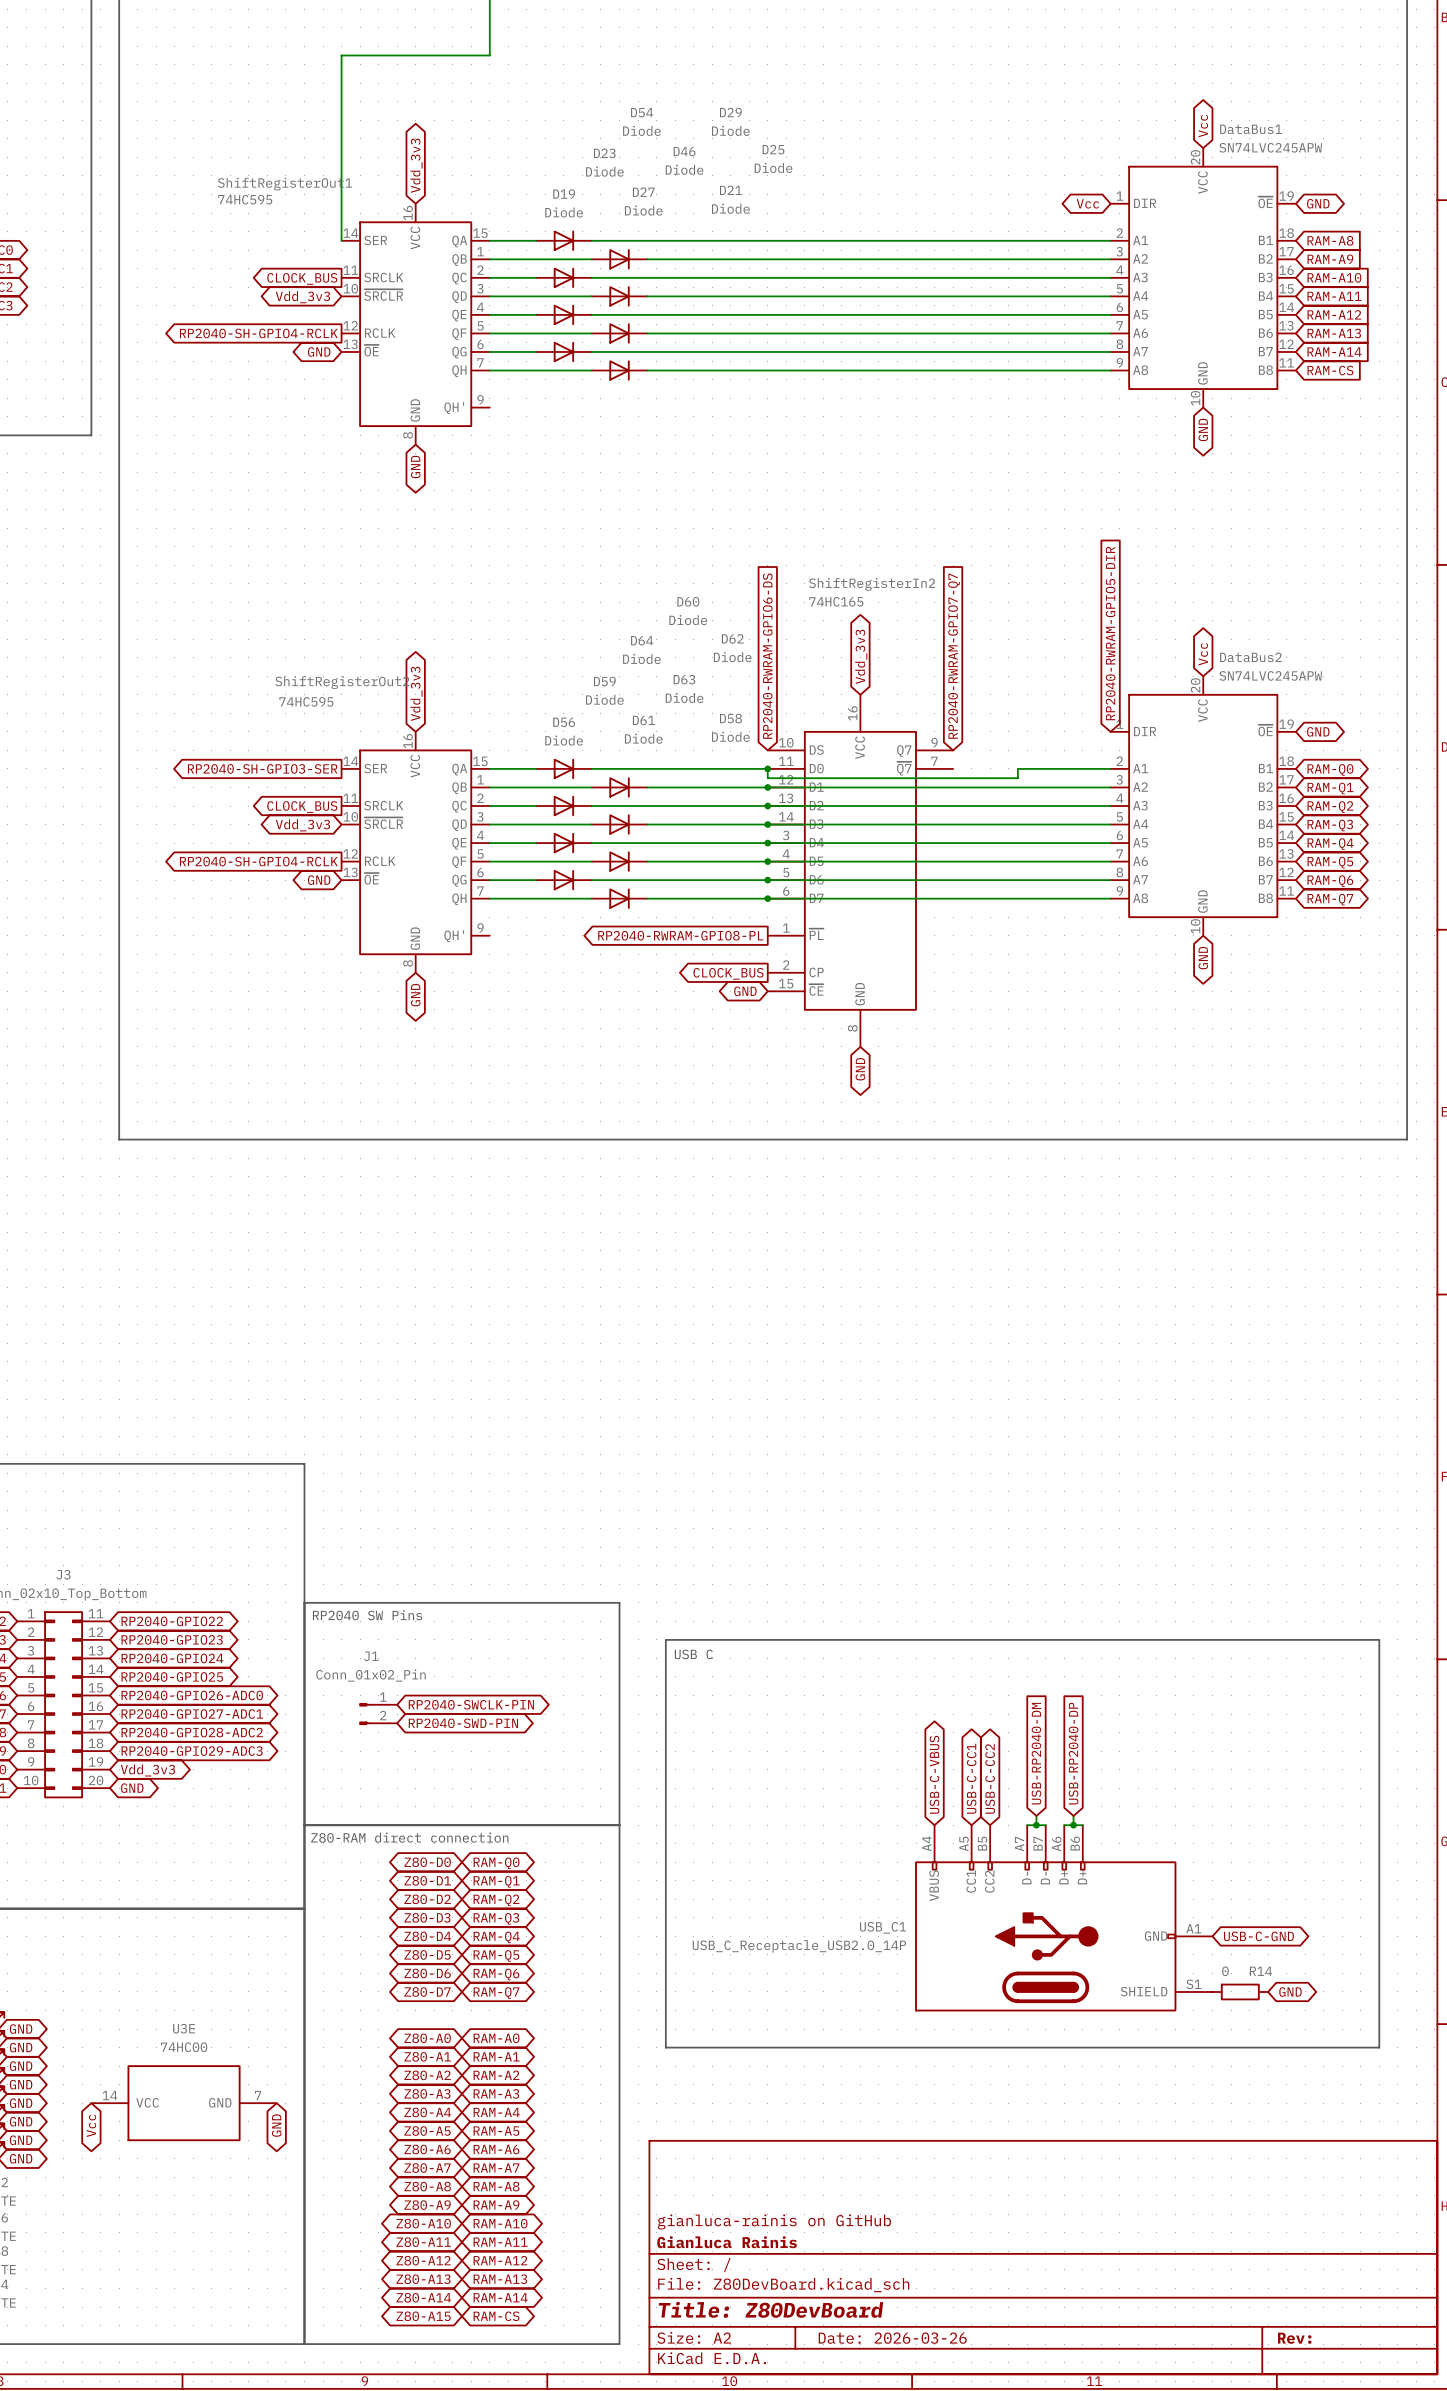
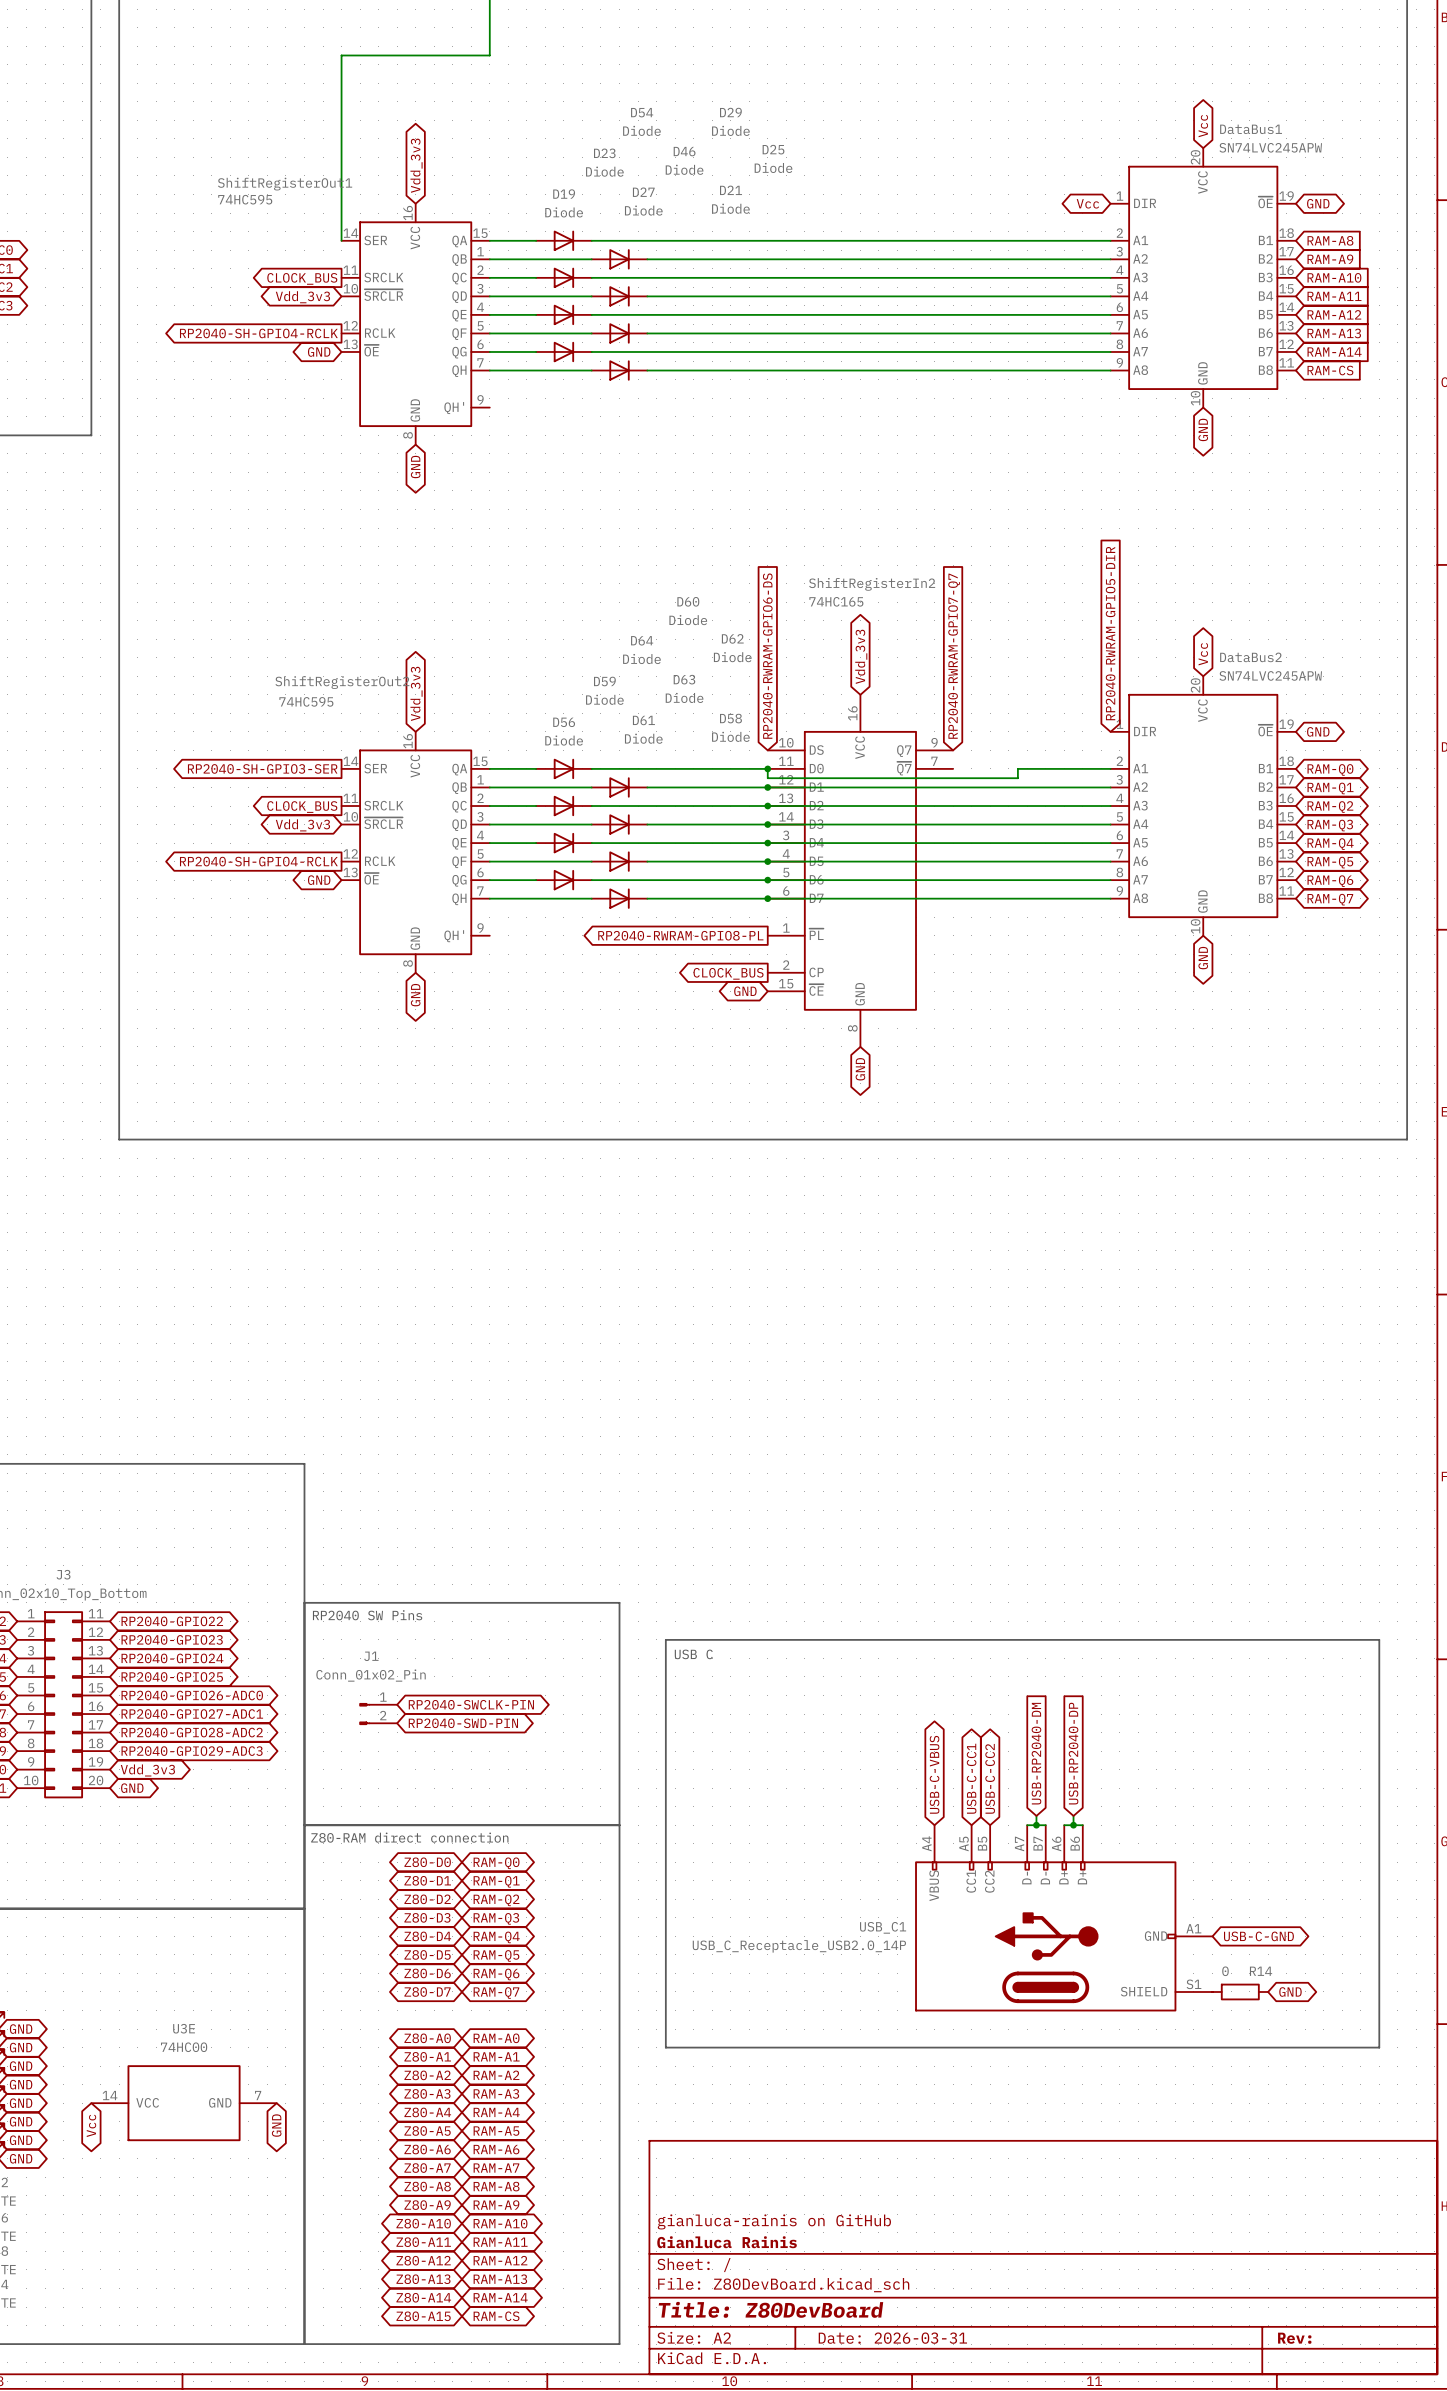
title block: Date: 2026-03-26 (892, 2338) -> Date: 2026-03-31 (892, 2338)

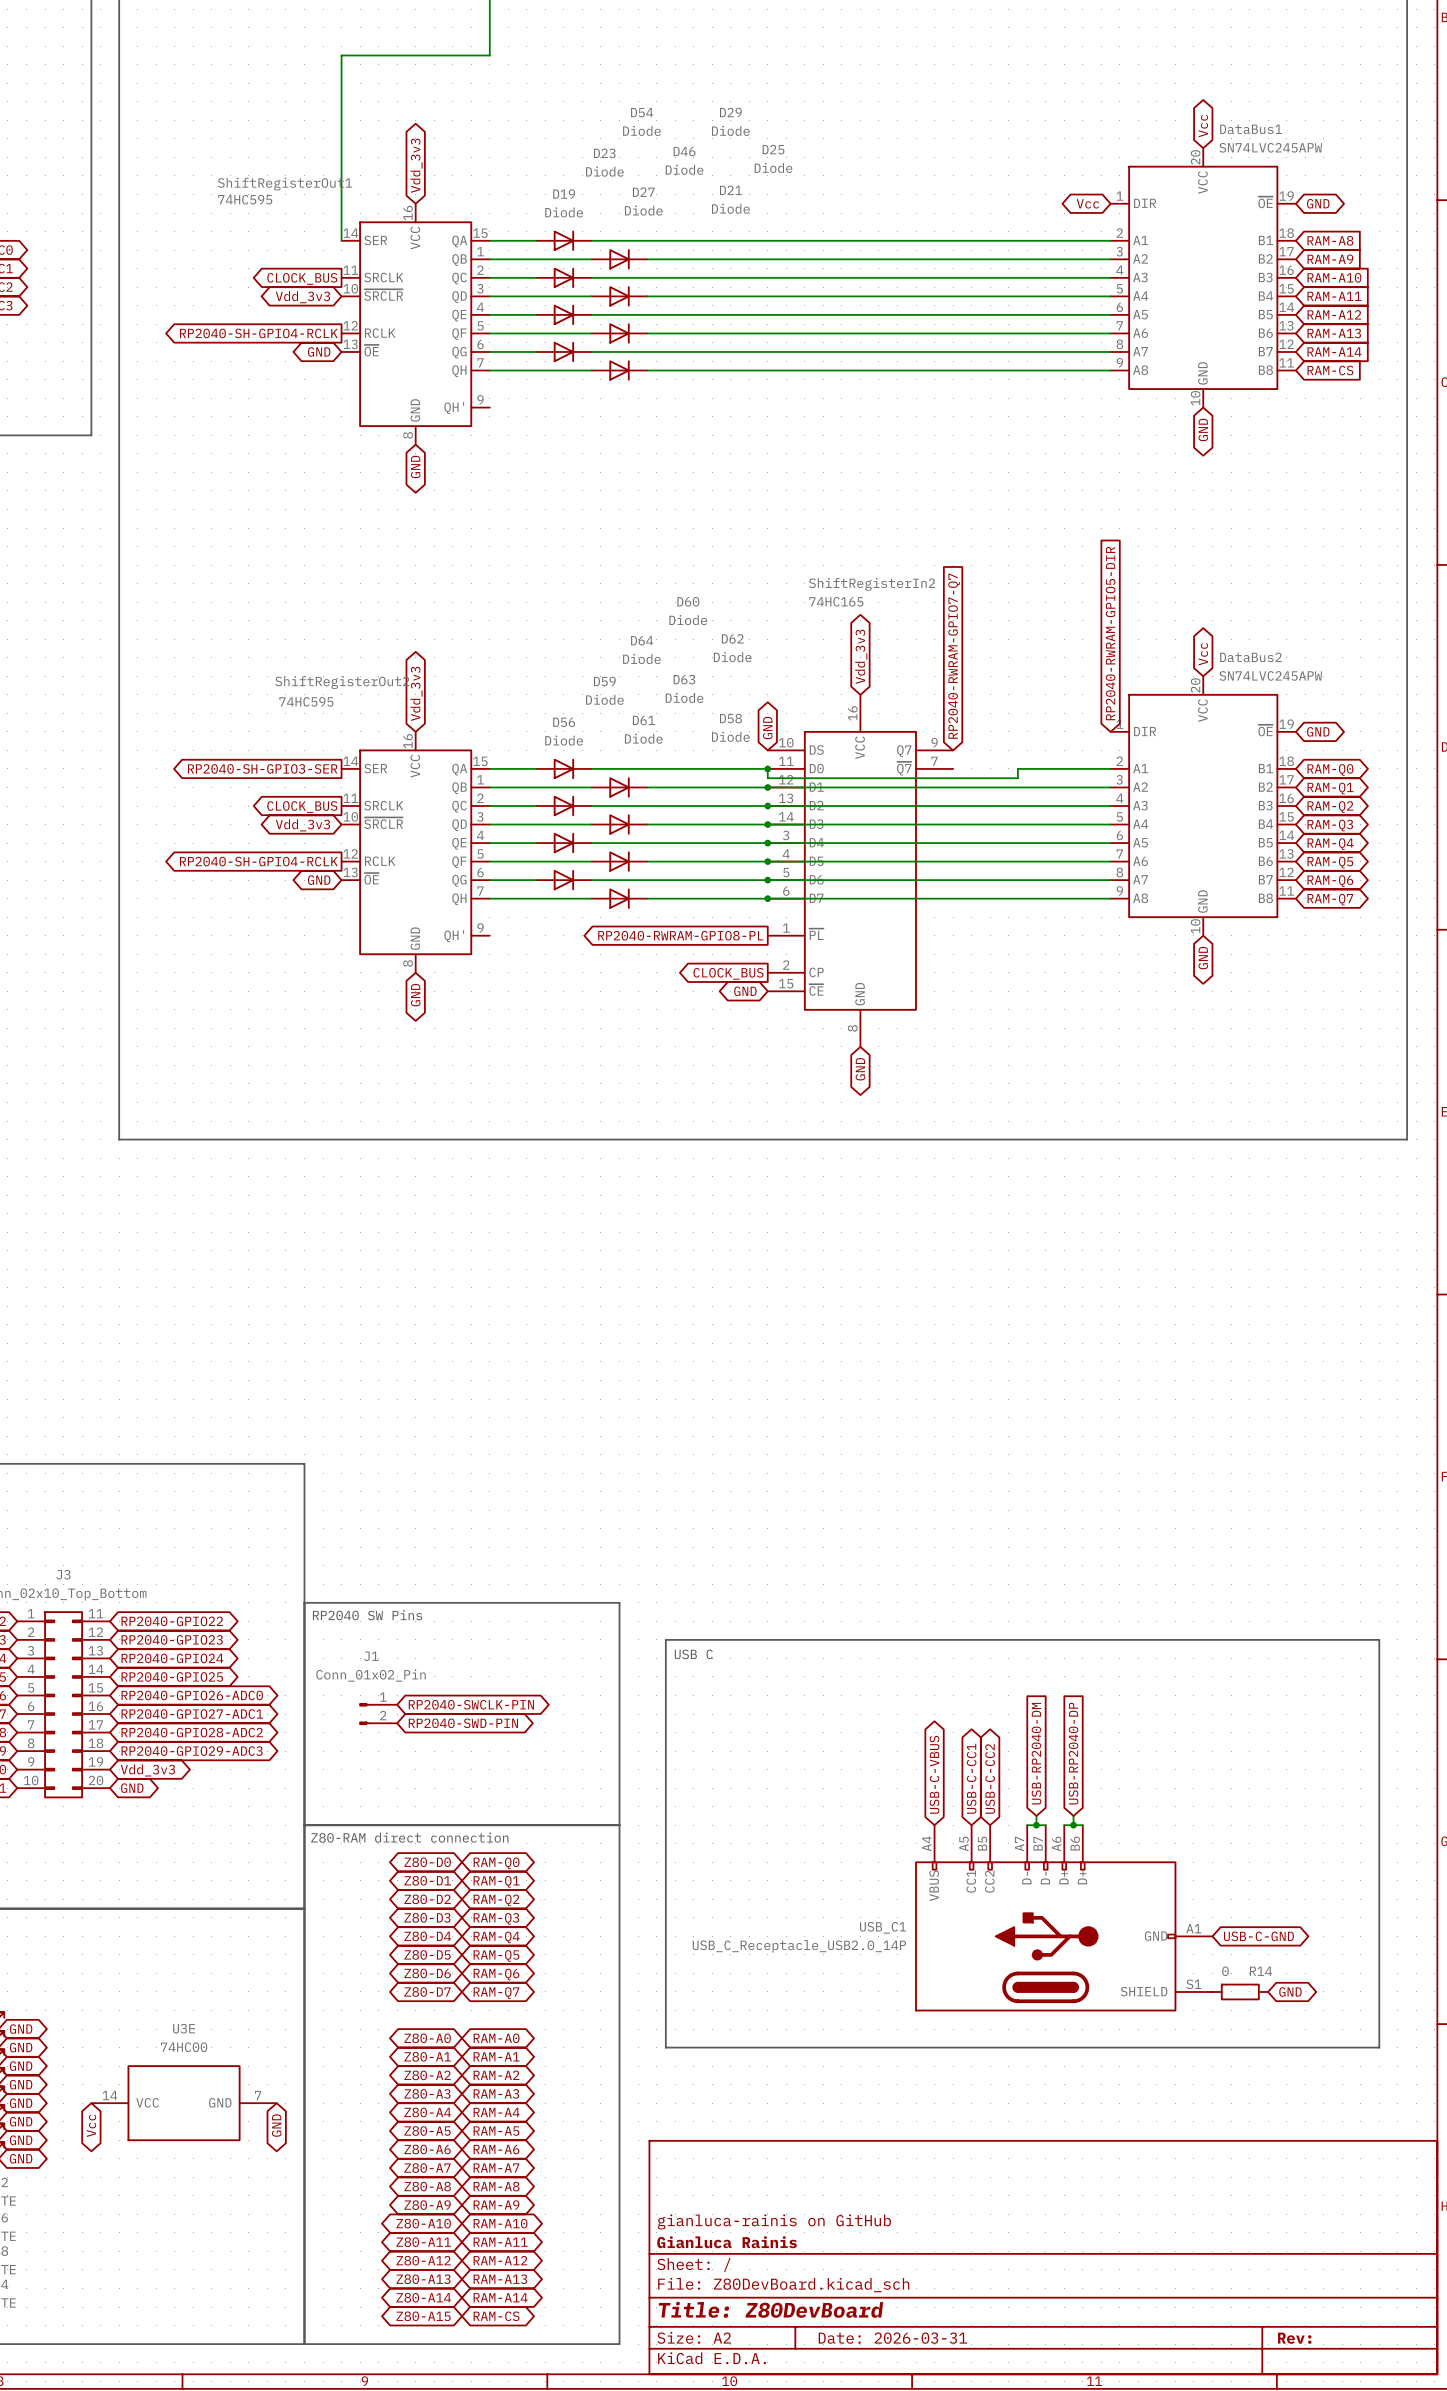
global label shape: input (767, 656) -> bidirectional (767, 728)
global label: RP2040-RWRAM-GPIO6-DS (767, 656) -> GND (767, 728)

